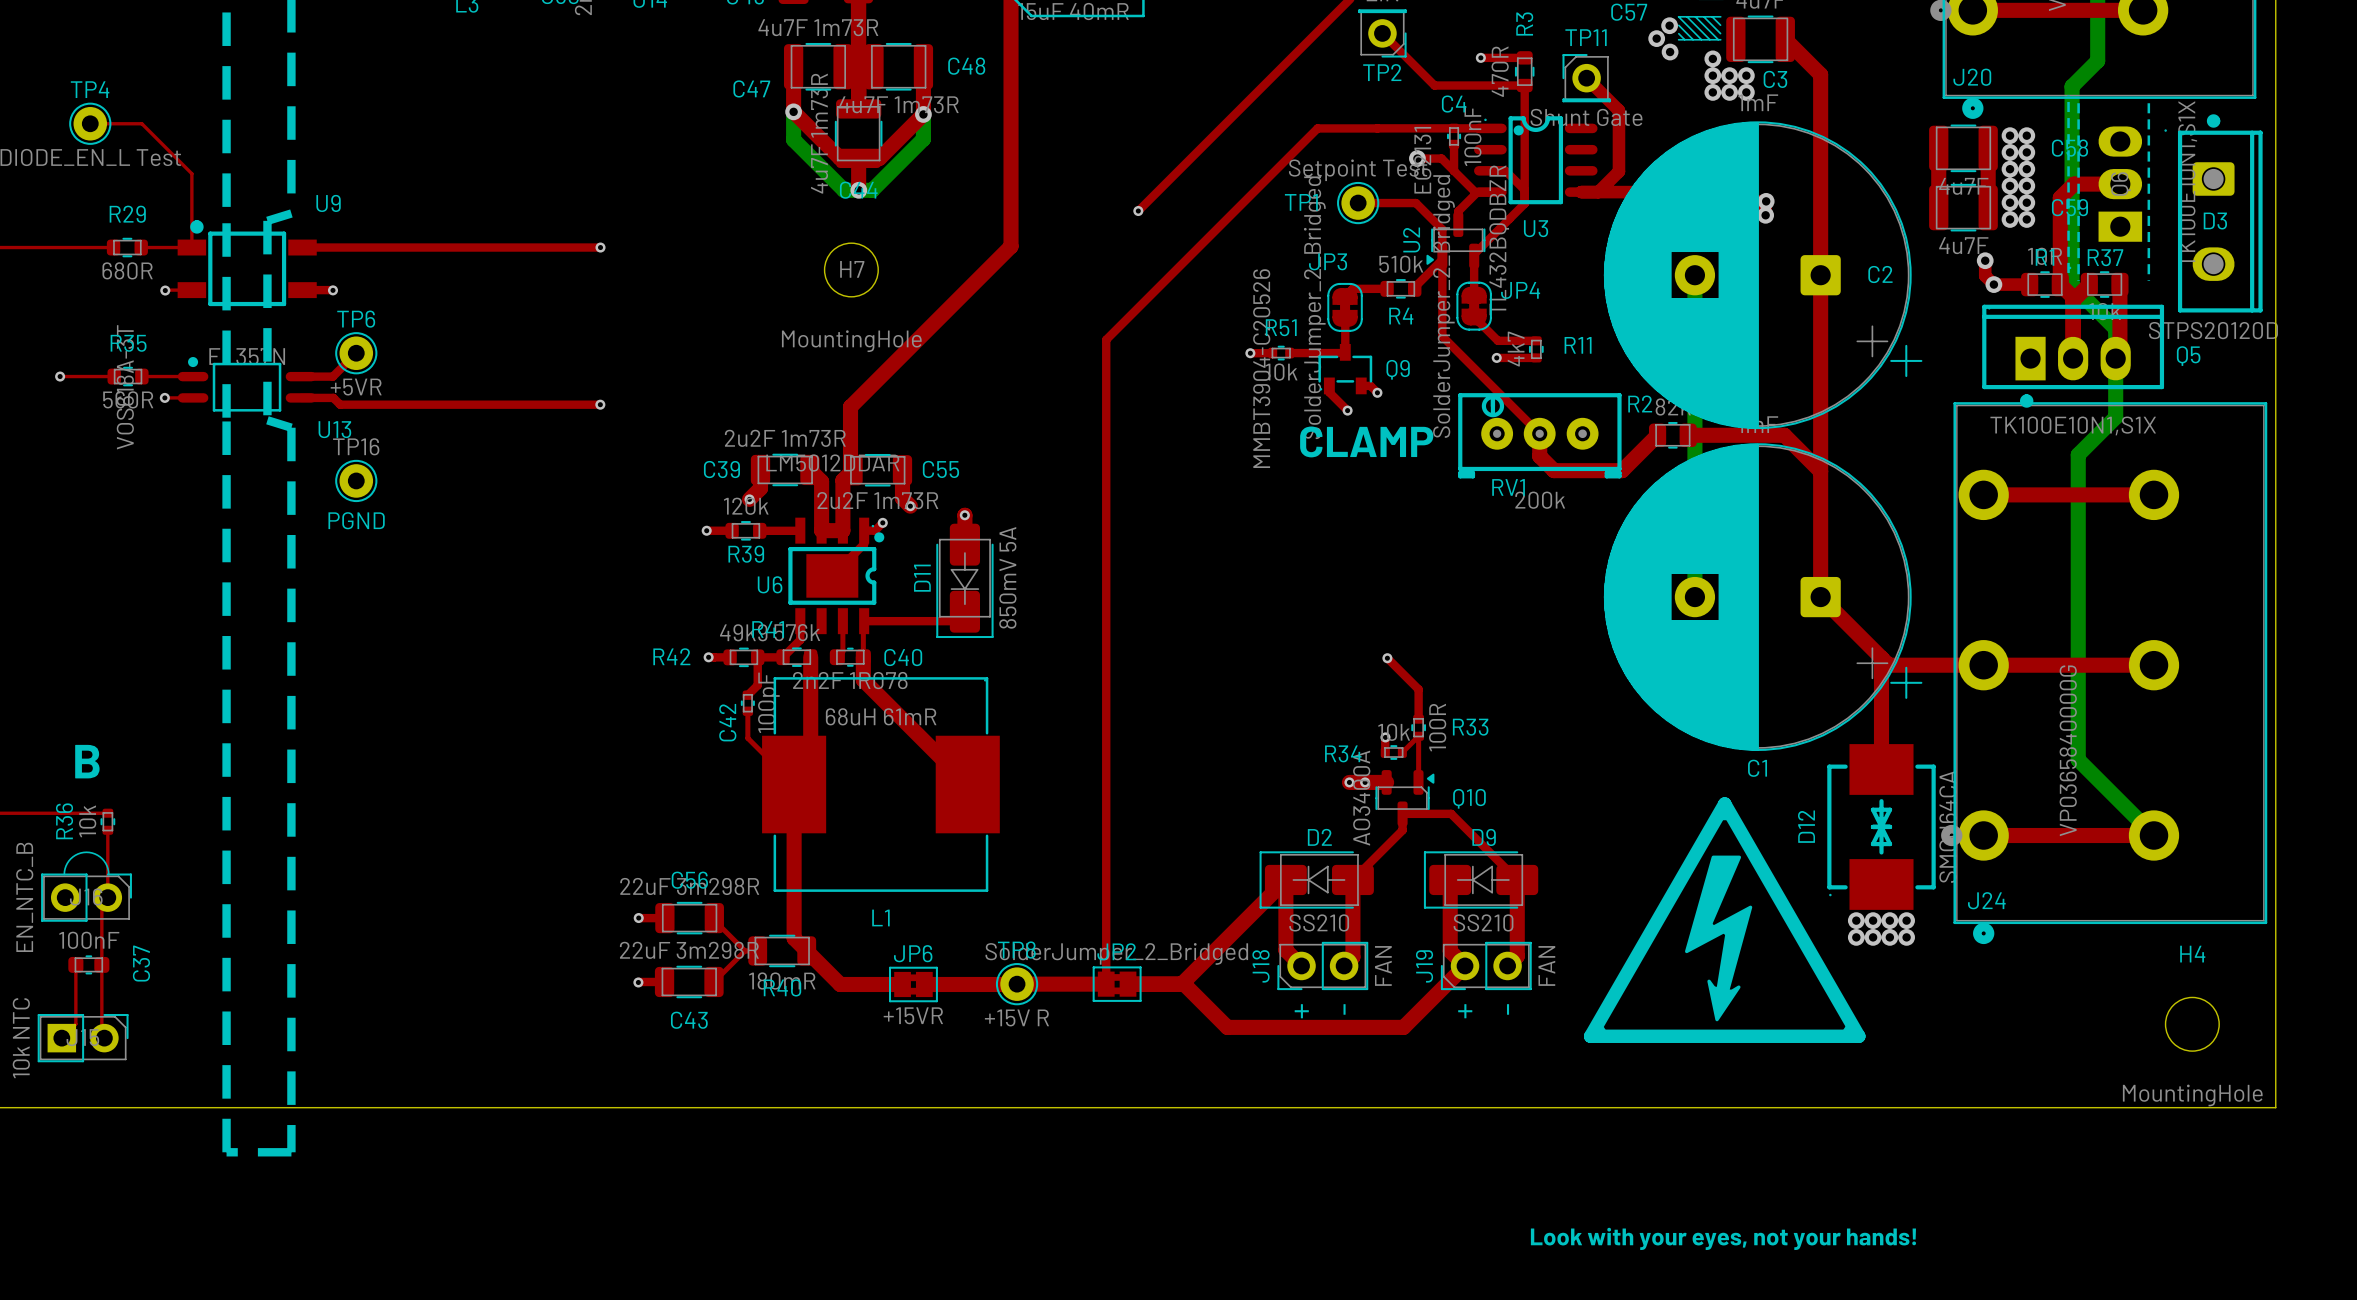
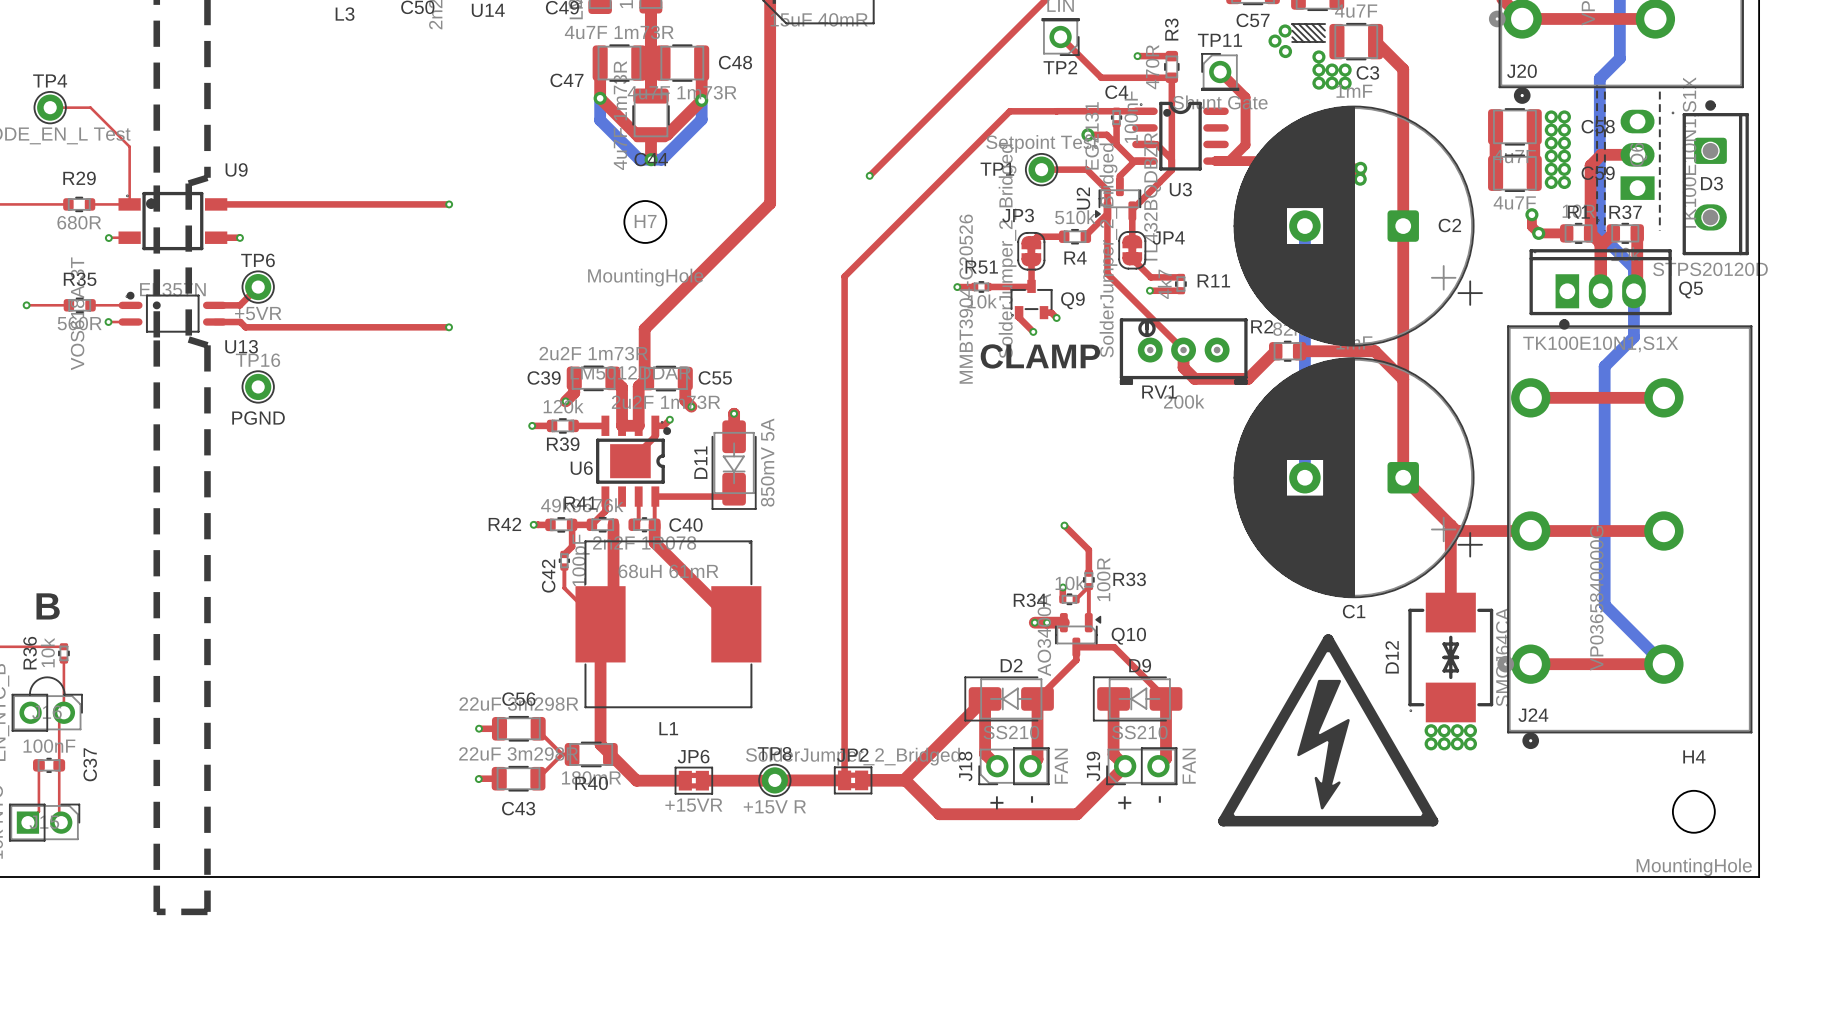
U9 footprint: [177, 220, 317, 307] -> [118, 191, 228, 251]
U13 footprint: [177, 357, 317, 412] -> [118, 291, 227, 333]
text: Look with your eyes, not your hands! (1723, 1238) -> none

